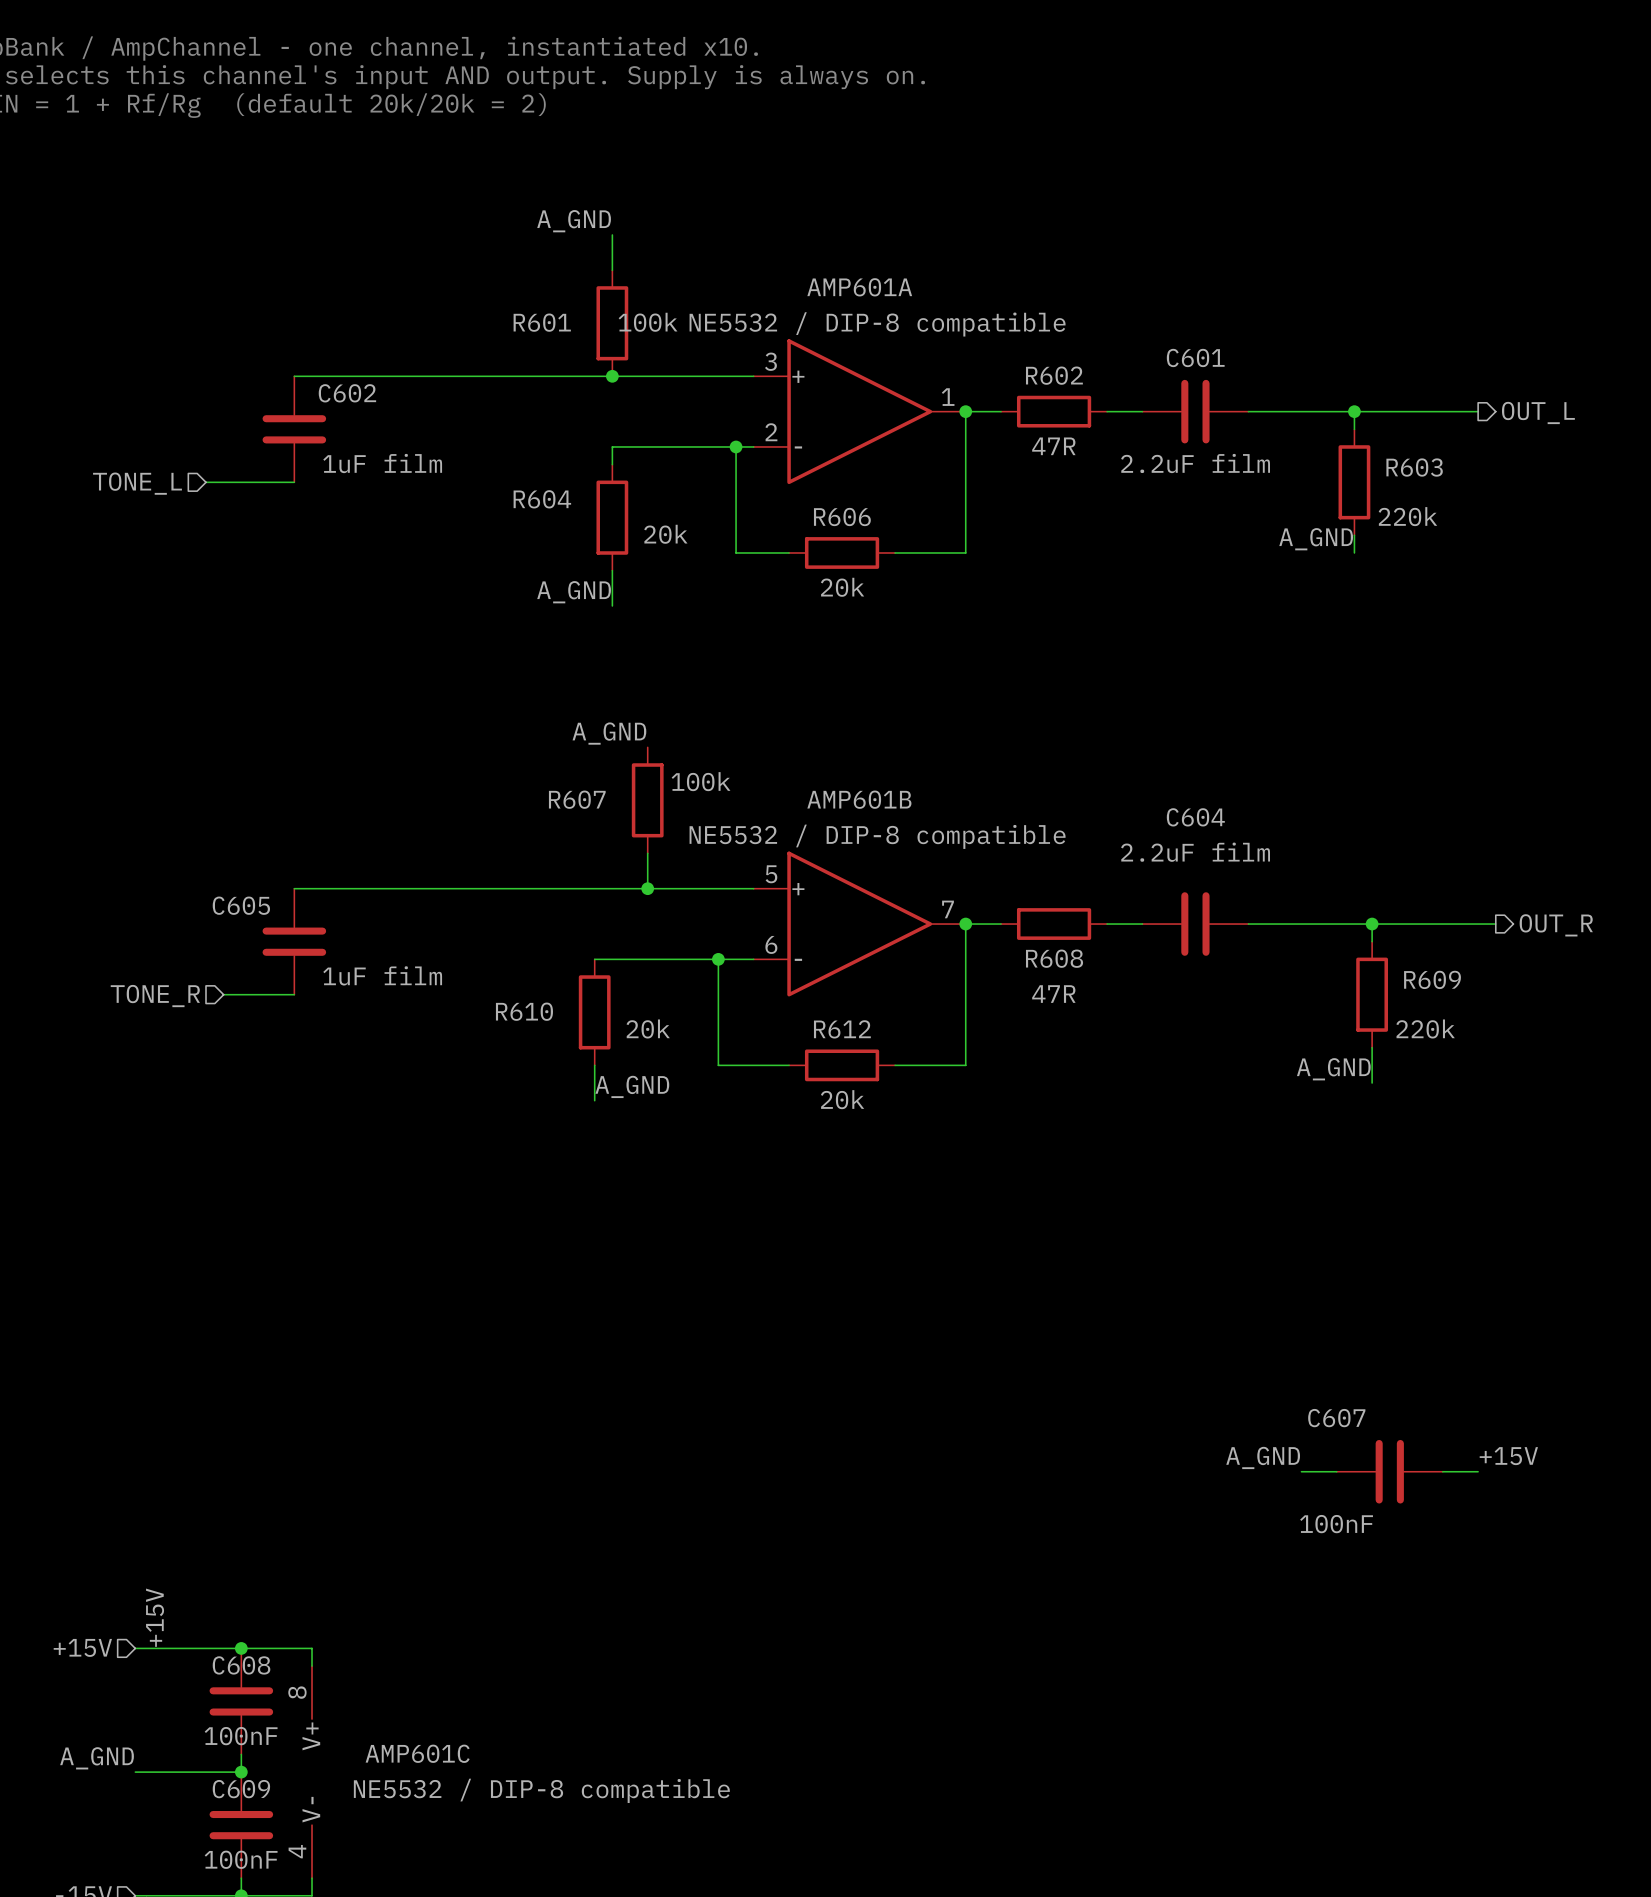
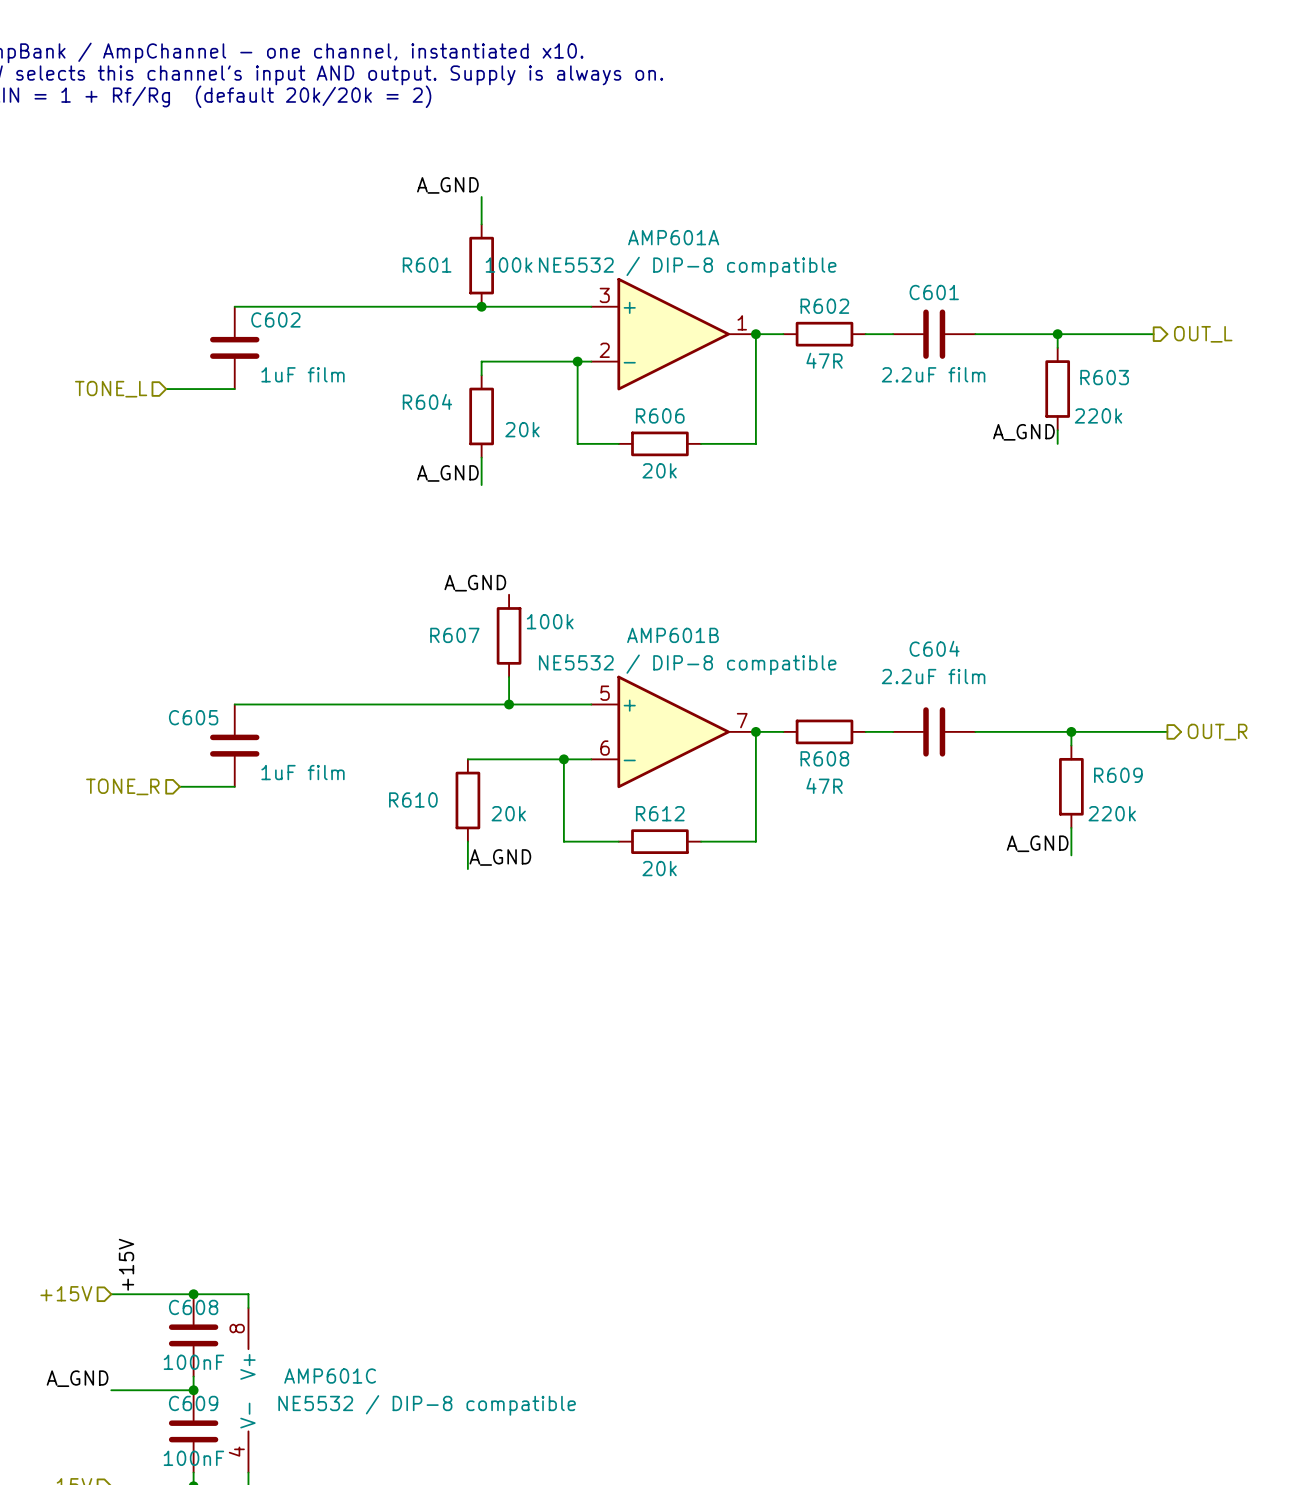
label: +15V (1508, 1456) -> none
label: A_GND (1263, 1457) -> none
wire: (1301, 1471) (1336, 1471) -> none
C607: 100nF (1389, 1471) -> none
wire: (1442, 1471) (1478, 1471) -> none

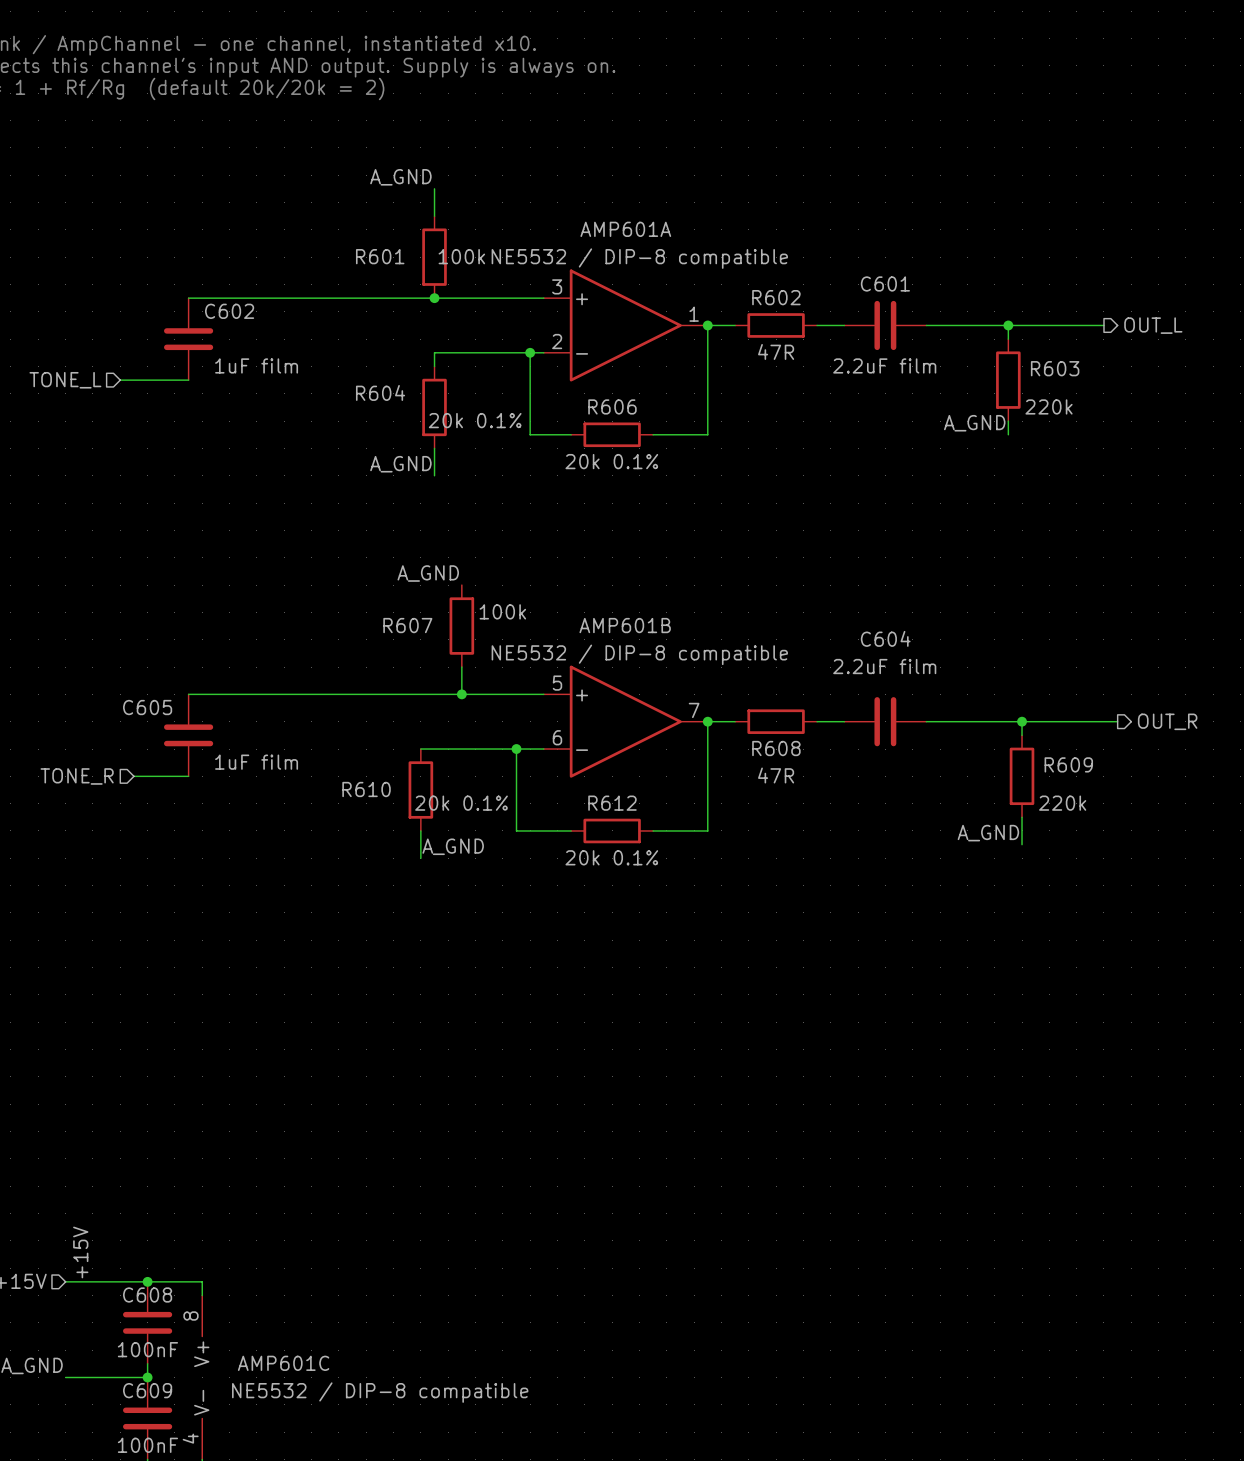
R604 value: 20k (522, 429) -> 20k 0.1% (475, 420)
R606 value: 20k (659, 470) -> 20k 0.1% (611, 461)
R610 value: 20k (508, 813) -> 20k 0.1% (461, 803)
R612 value: 20k (659, 868) -> 20k 0.1% (611, 857)

